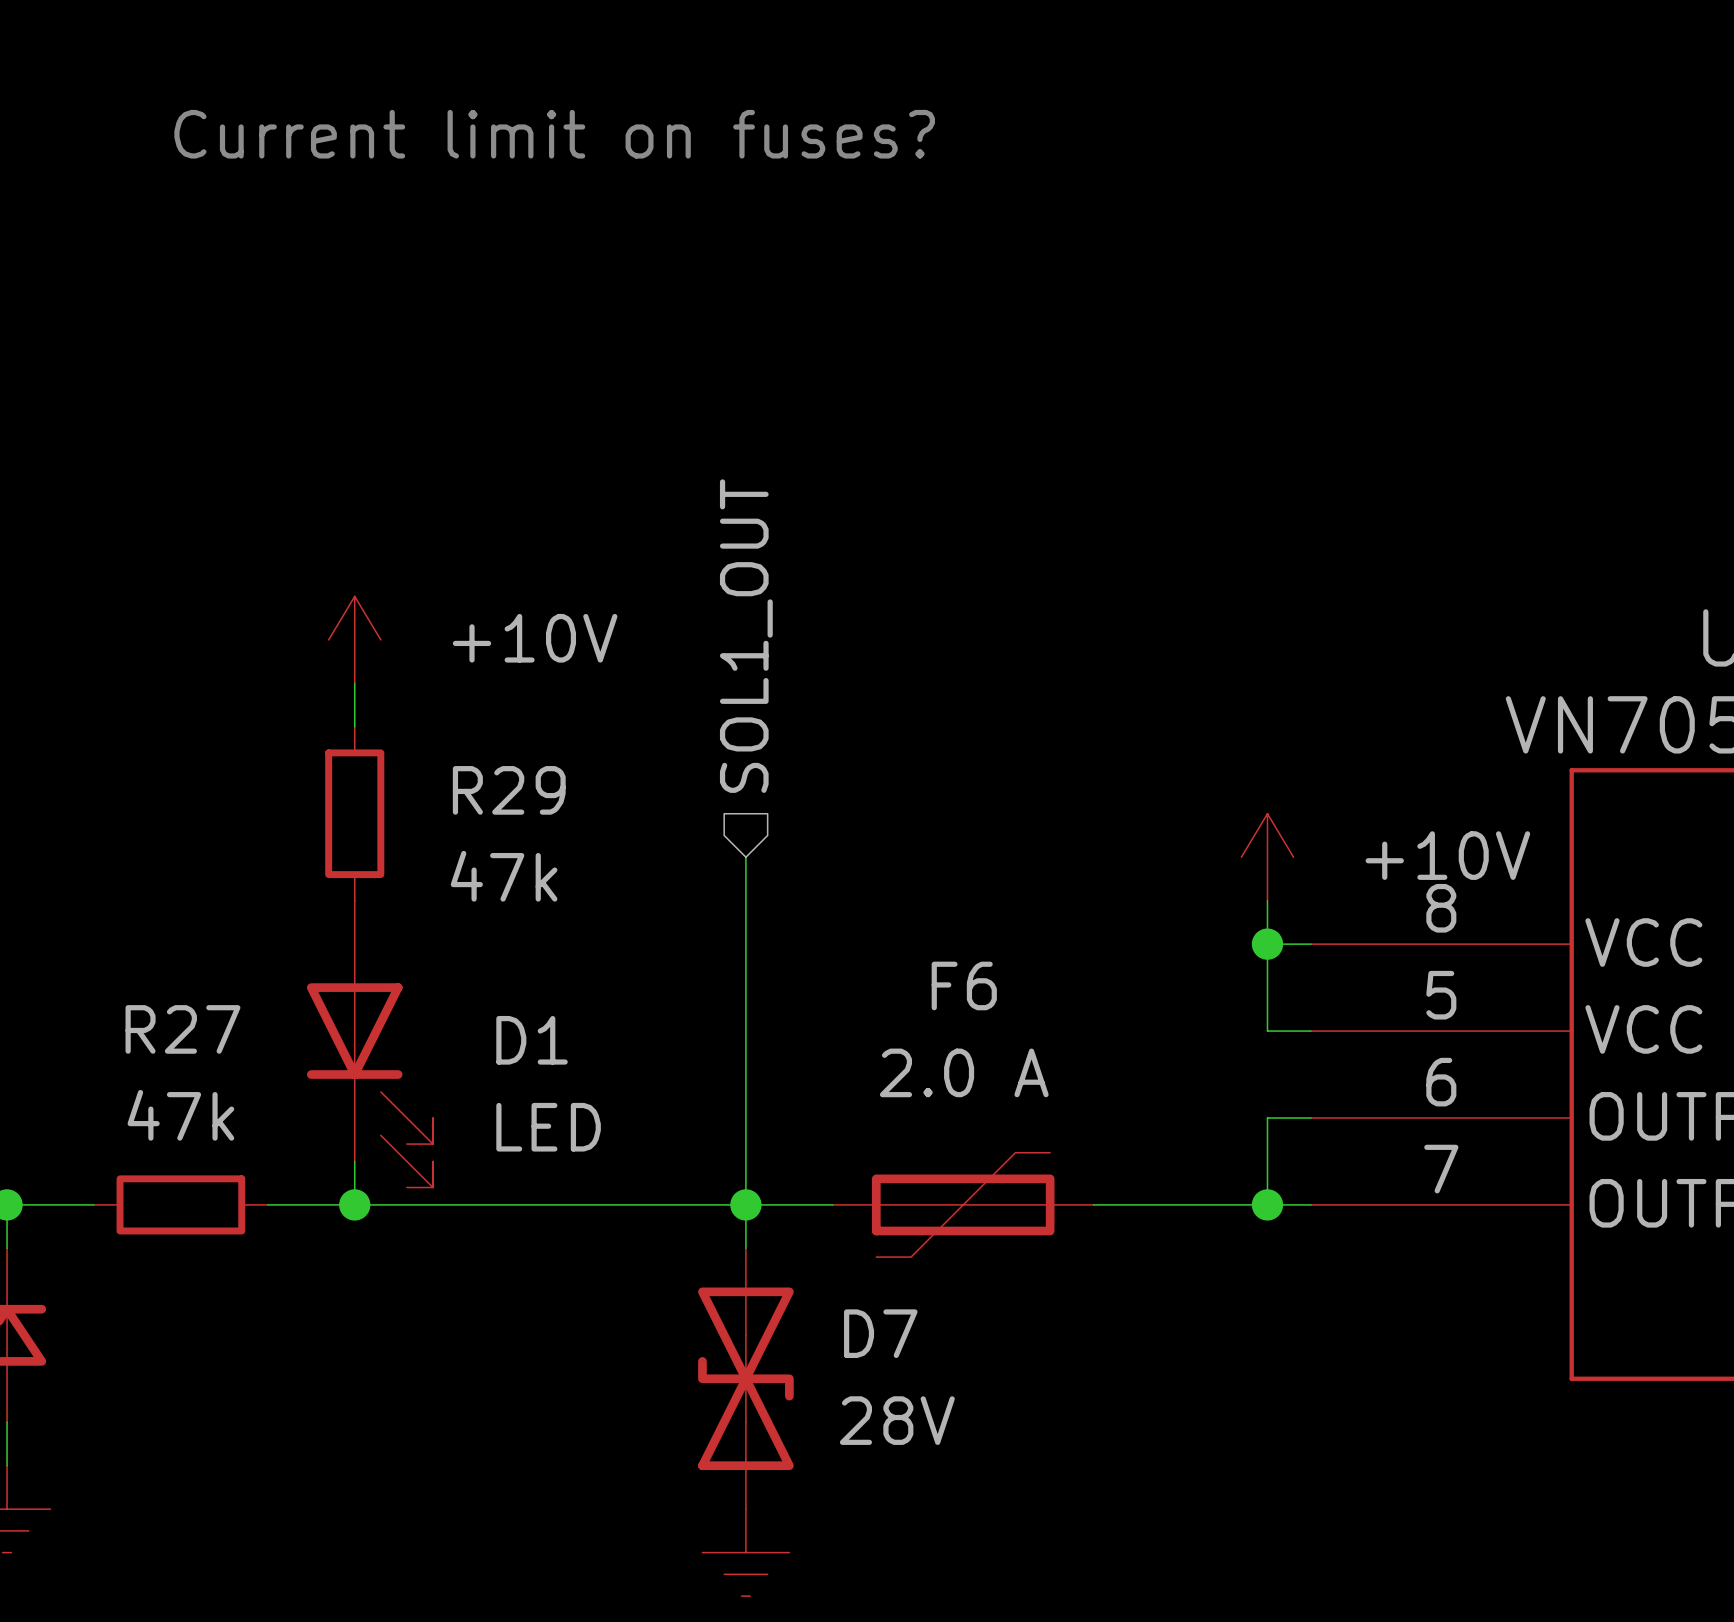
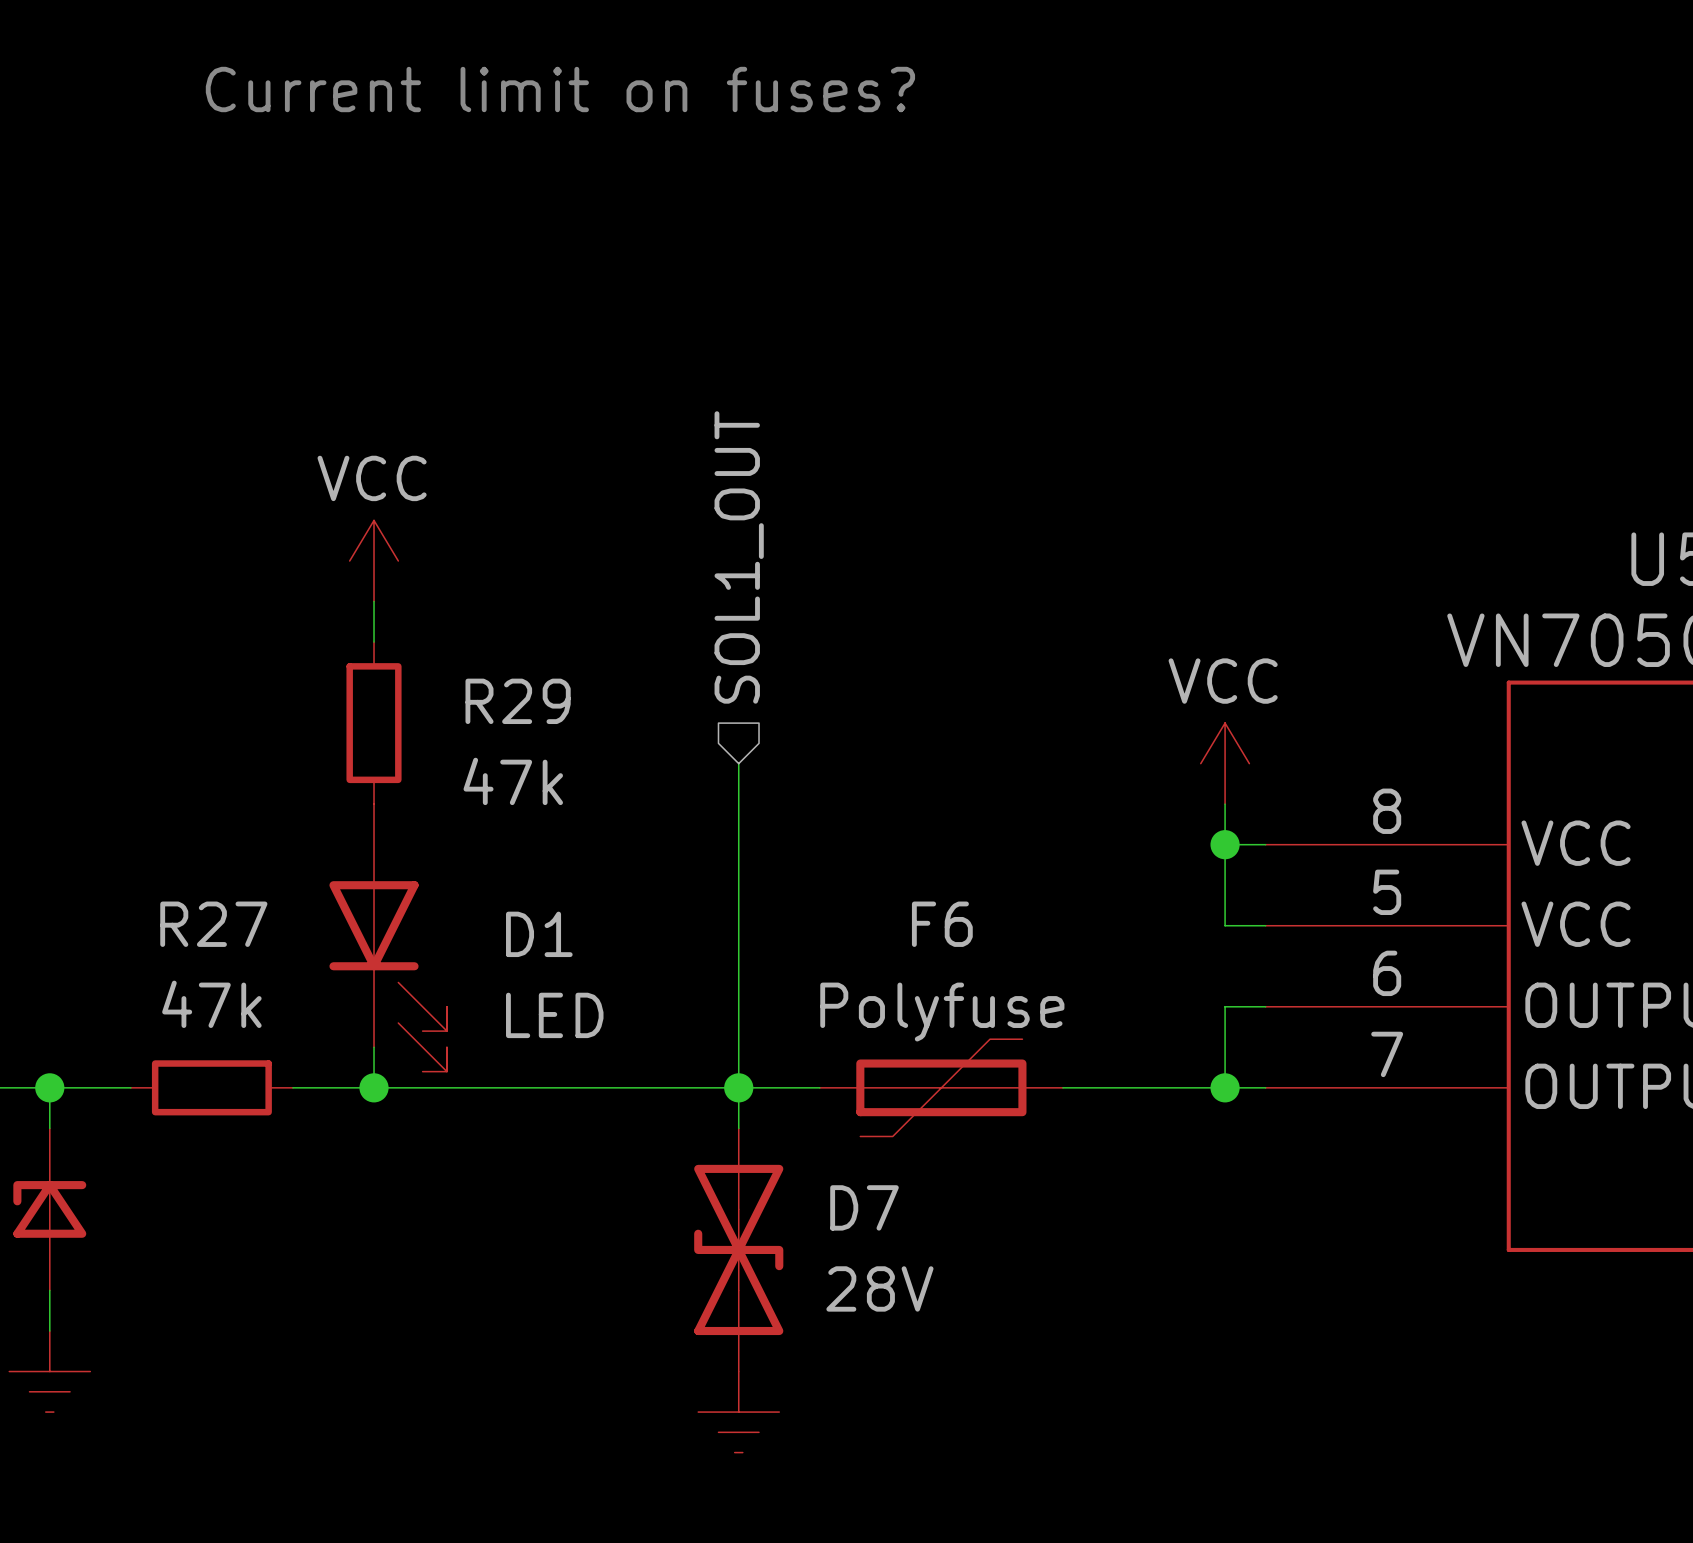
power symbol: +10V (354, 639) -> VCC (374, 561)
power symbol: +10V (1267, 857) -> VCC (1225, 763)
F6 name position: F6 (964, 985) -> F6 (942, 924)
F6 value: 2.0 A (964, 1072) -> Polyfuse (942, 1012)

